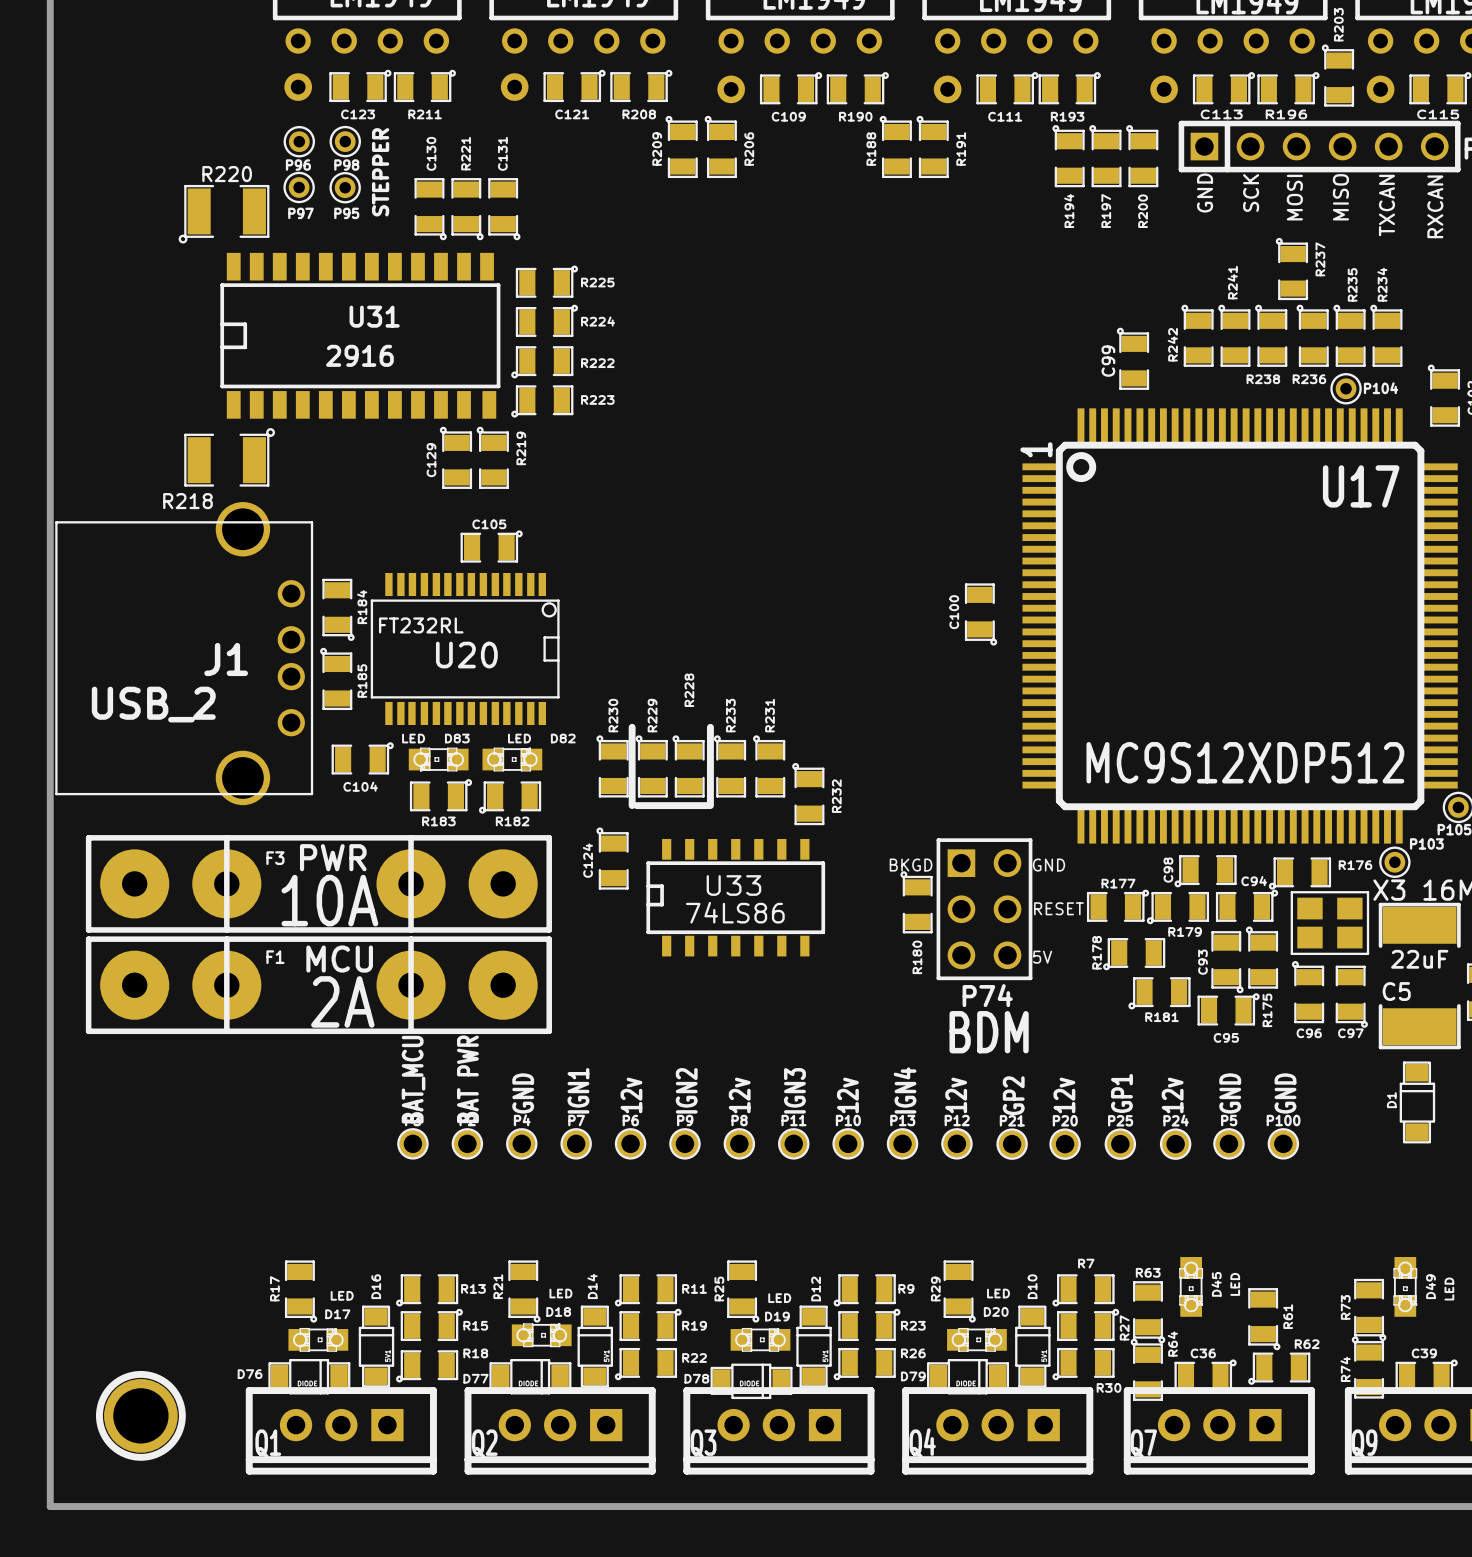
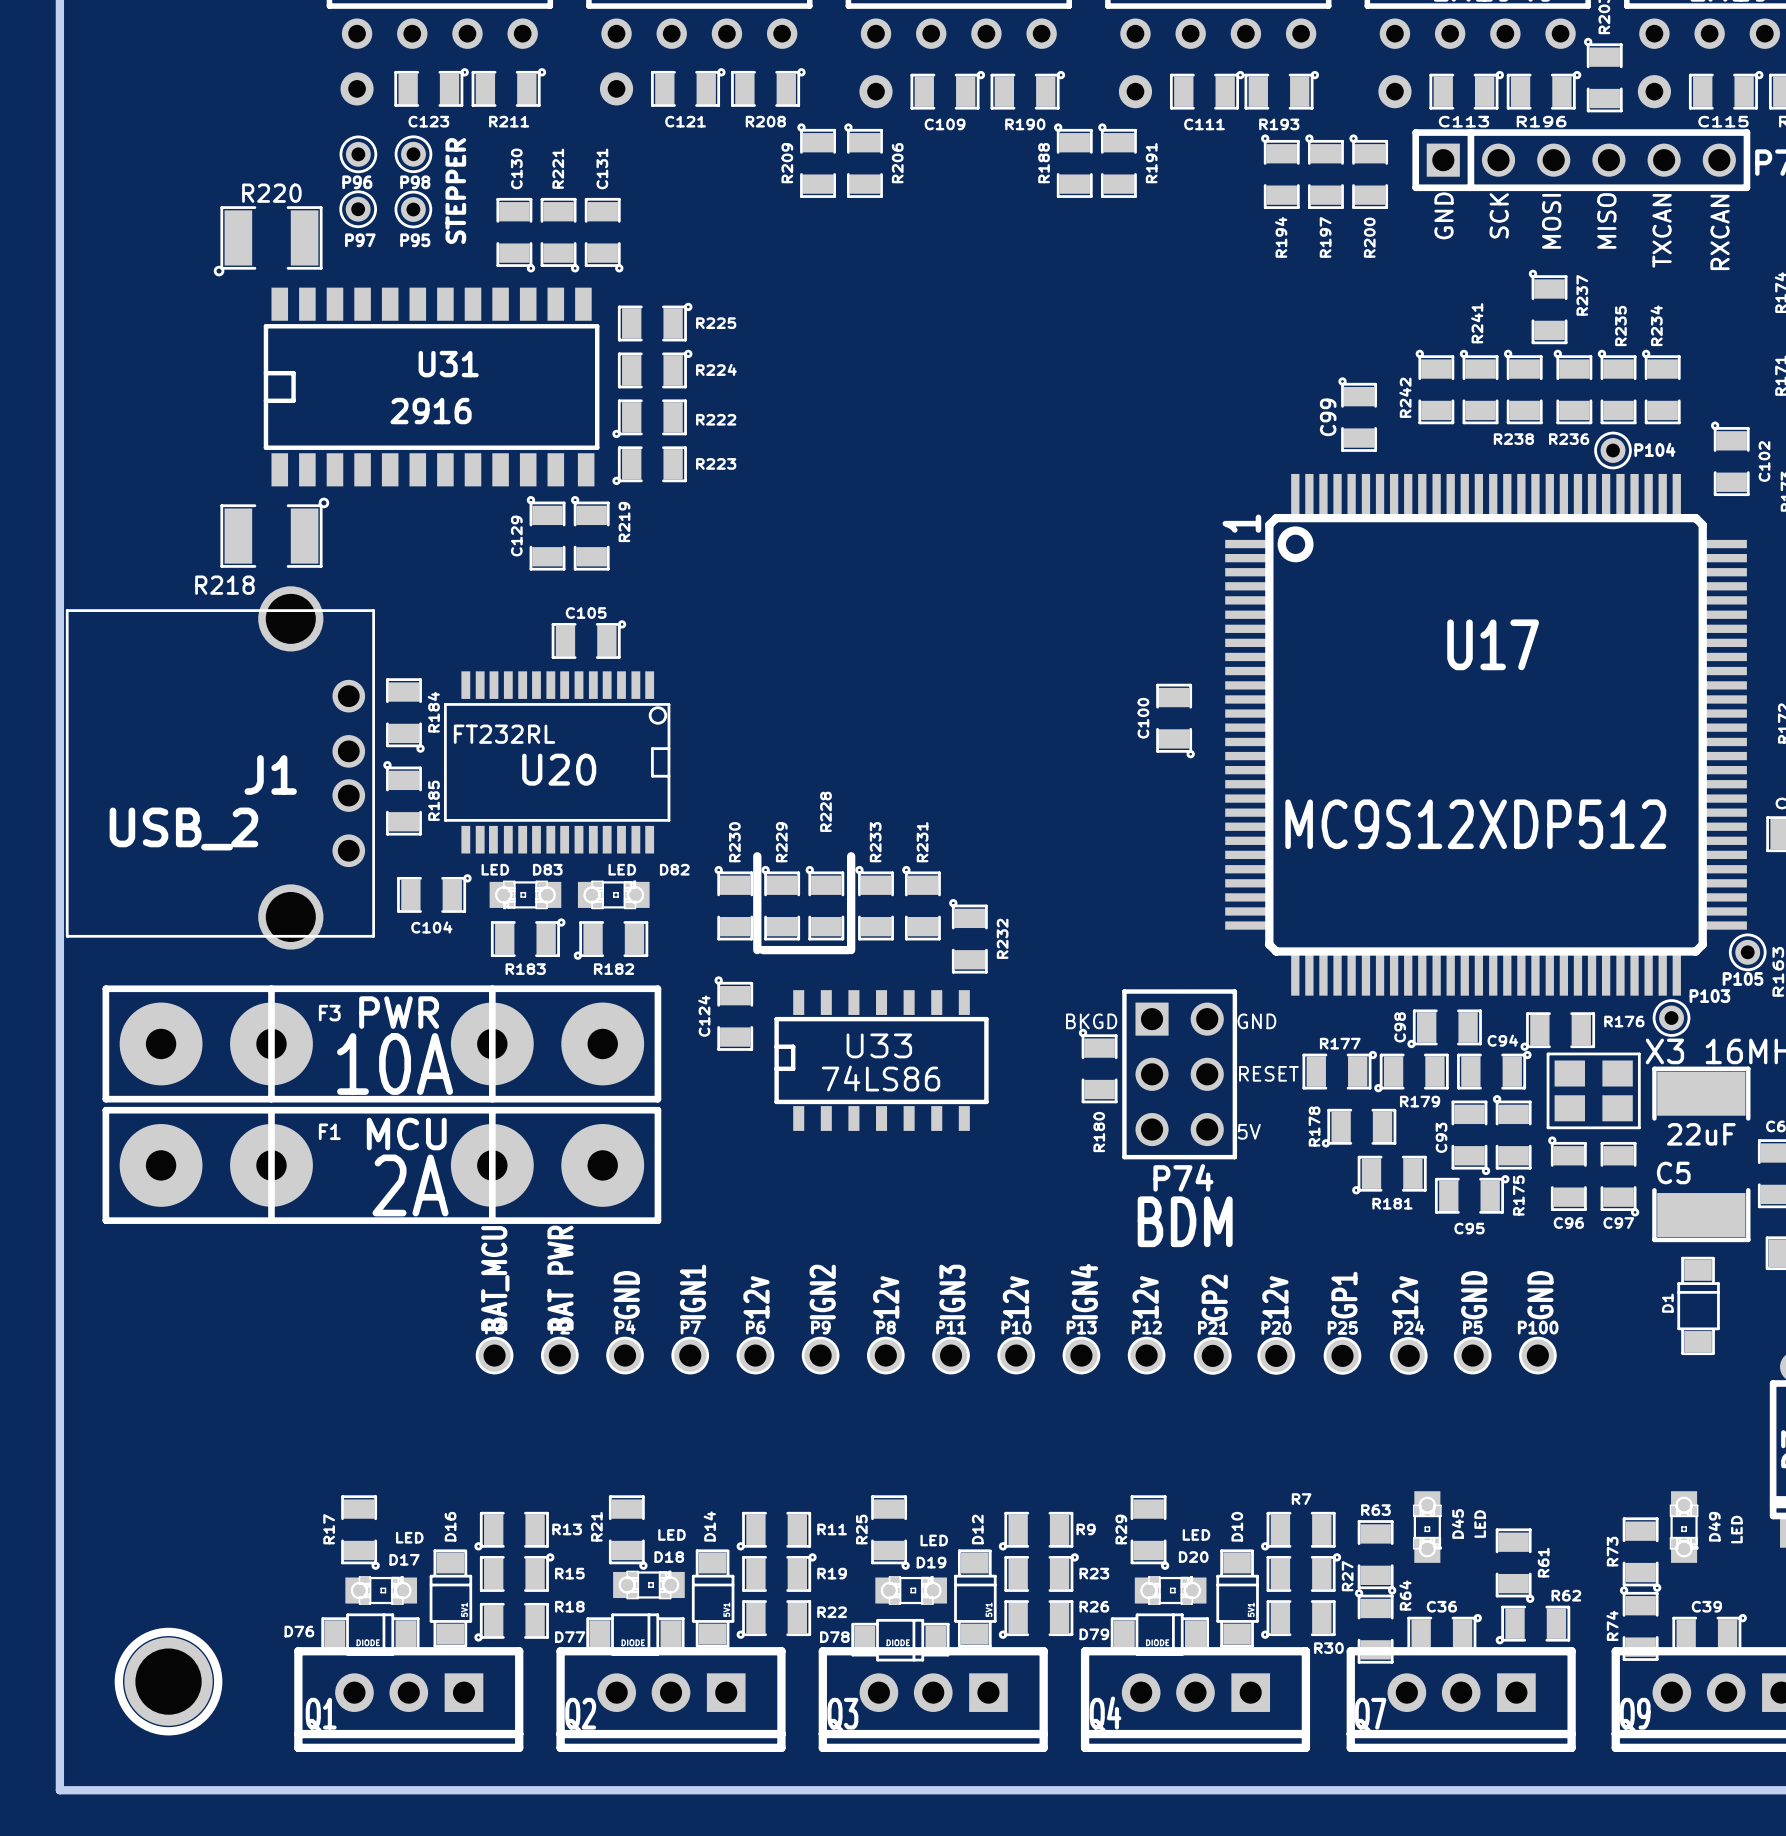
U17 name position: U17 (1361, 486) -> U17 (1493, 644)
U17 value position: MC9S12XDP512 (1245, 762) -> MC9S12XDP512 (1475, 824)

